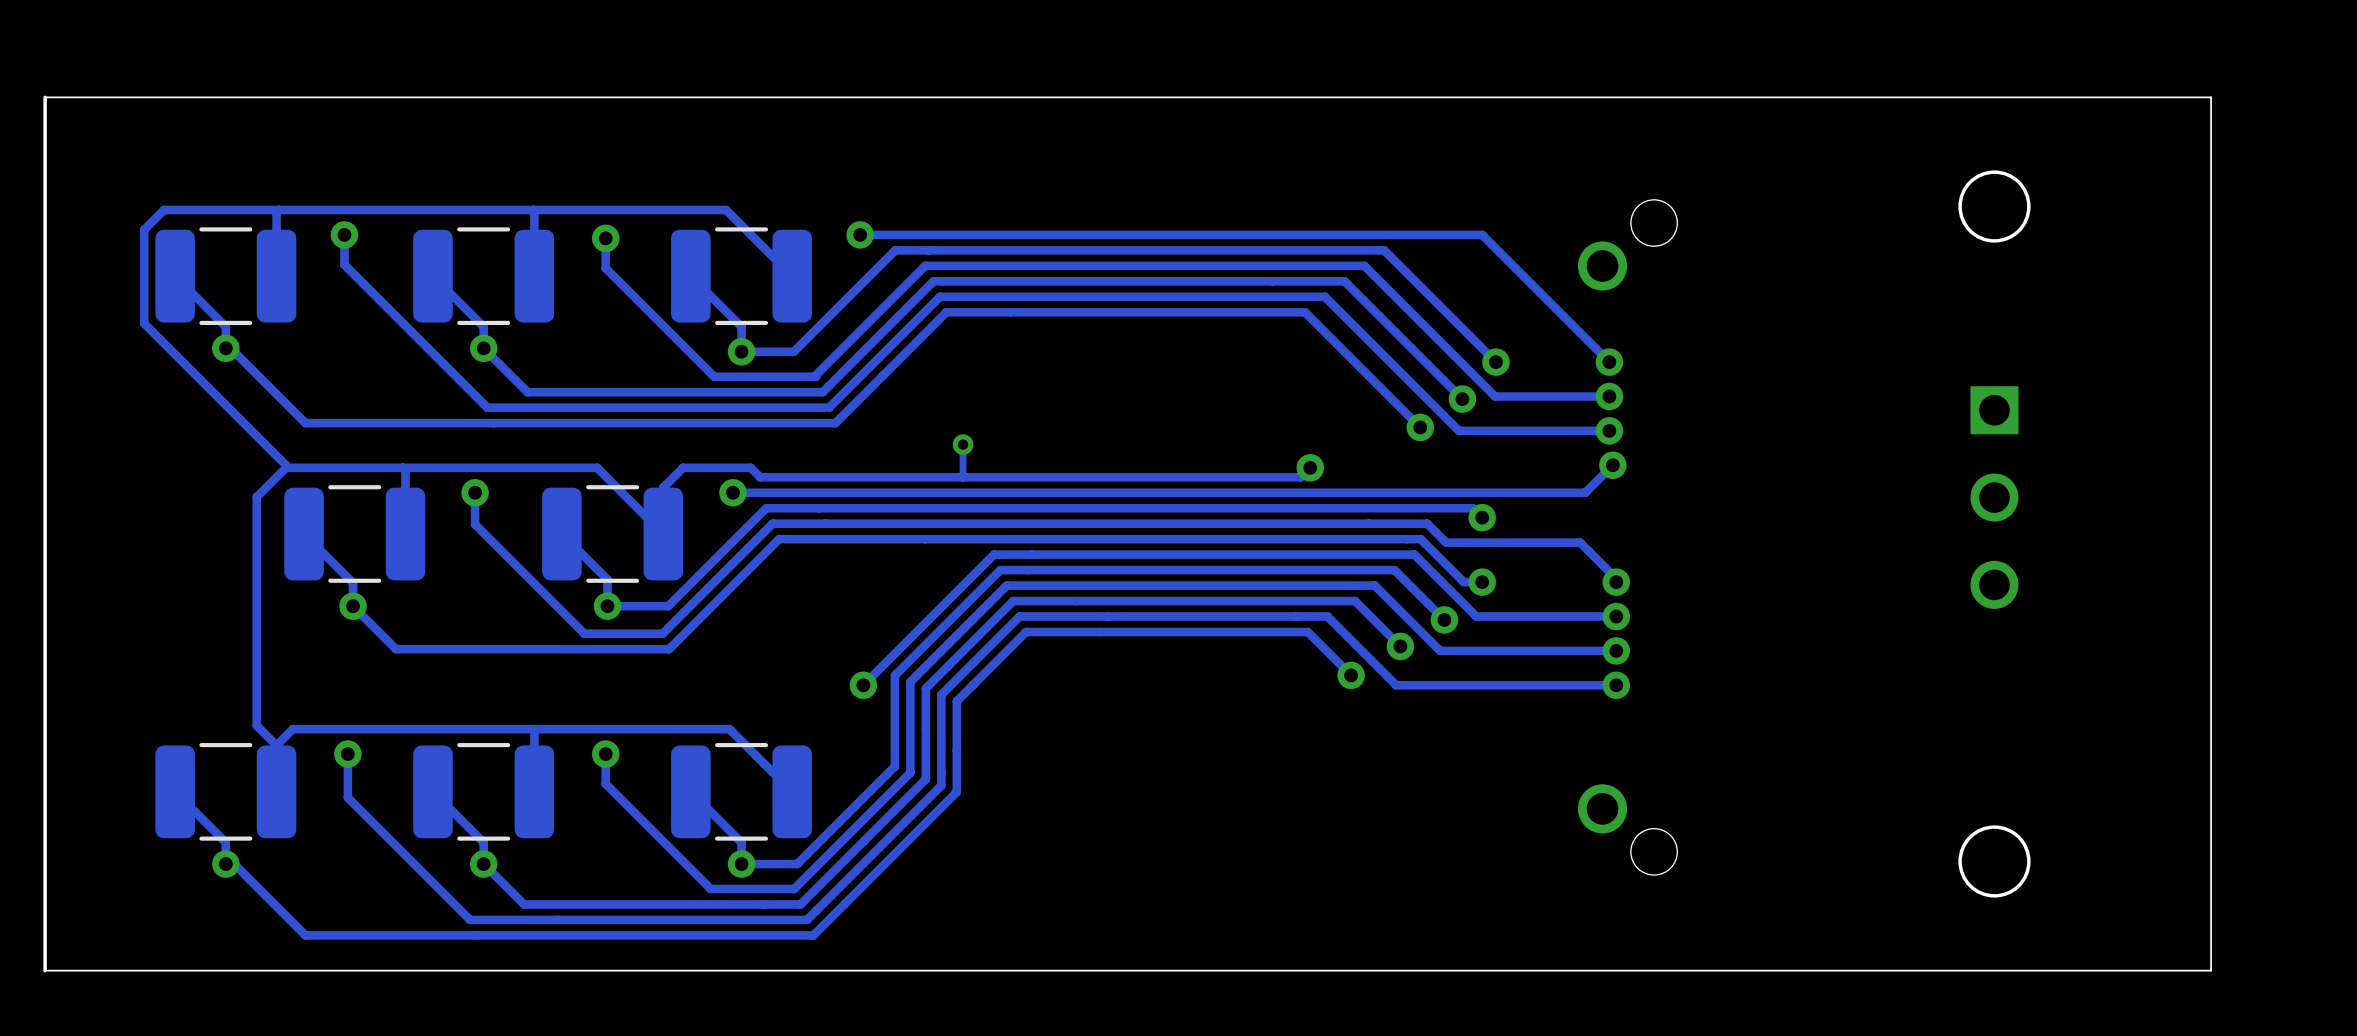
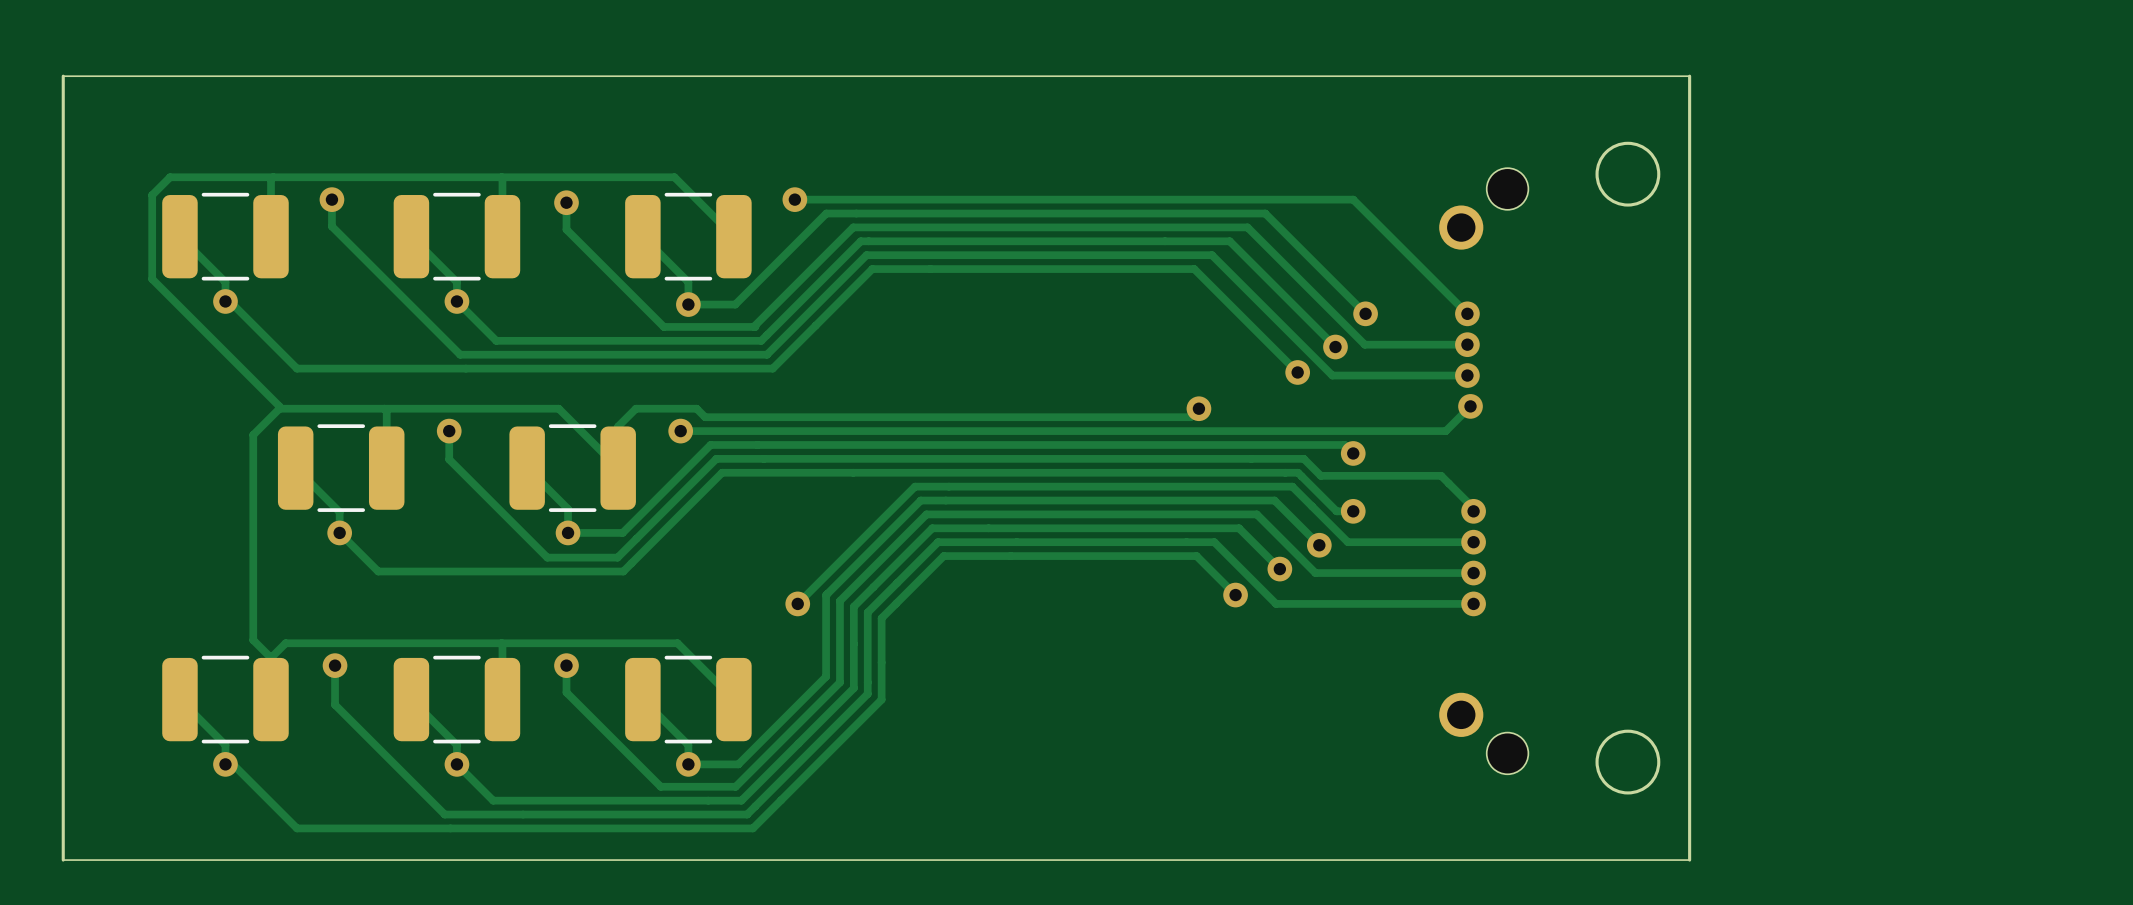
board edge: (1856, 97) (2211, 97) (2211, 970) (1856, 970) -> (1689, 76) (1689, 860)
round board edge position: (1994, 206) -> (1627, 174)
track: (963, 444) (963, 477) -> none
via: (963, 444) -> none
part: (1994, 497) -> none
round board edge position: (1994, 861) -> (1627, 762)

